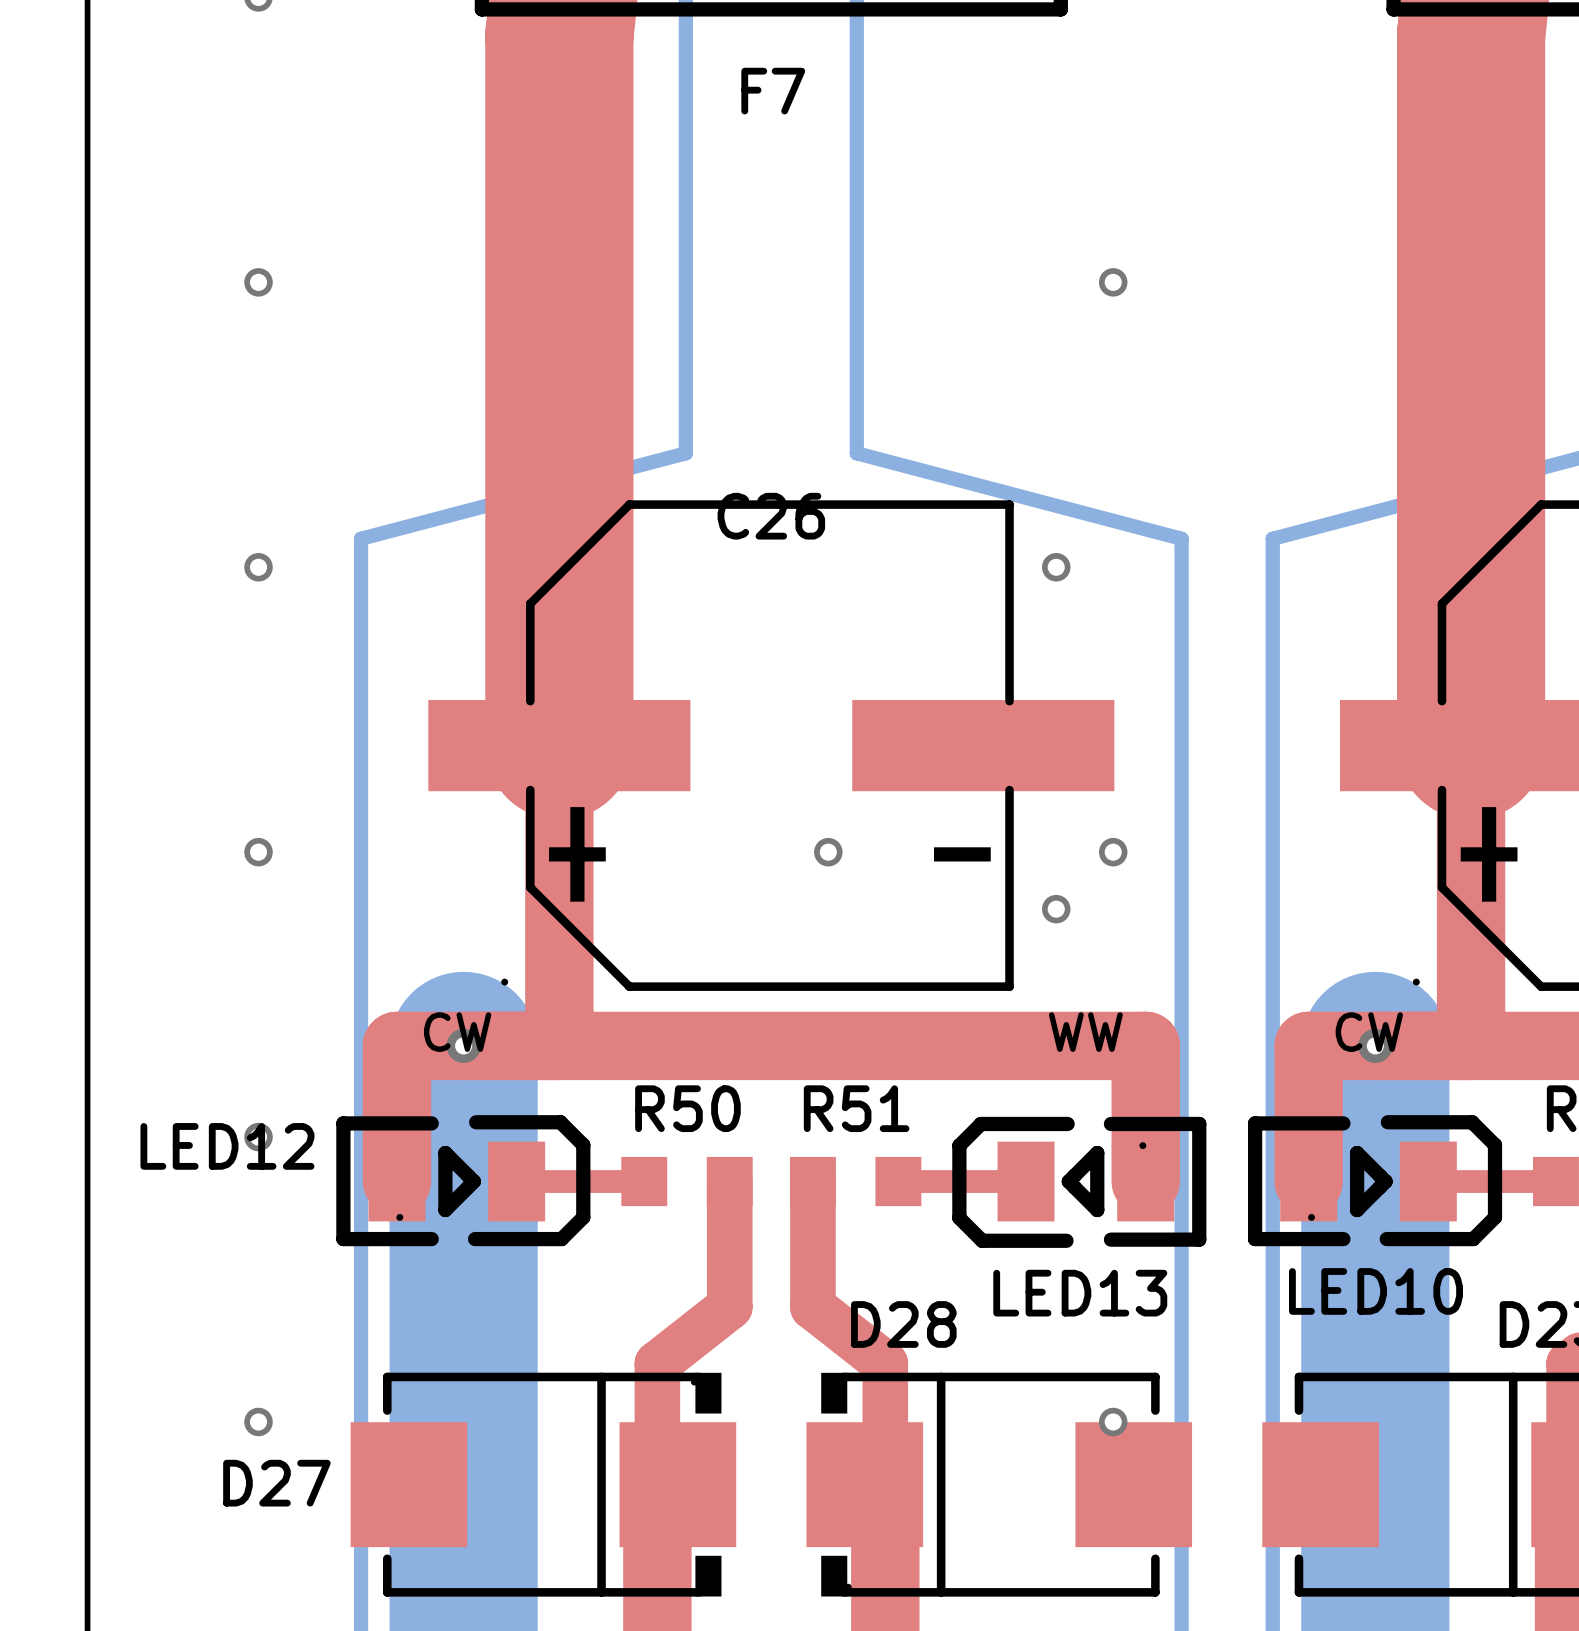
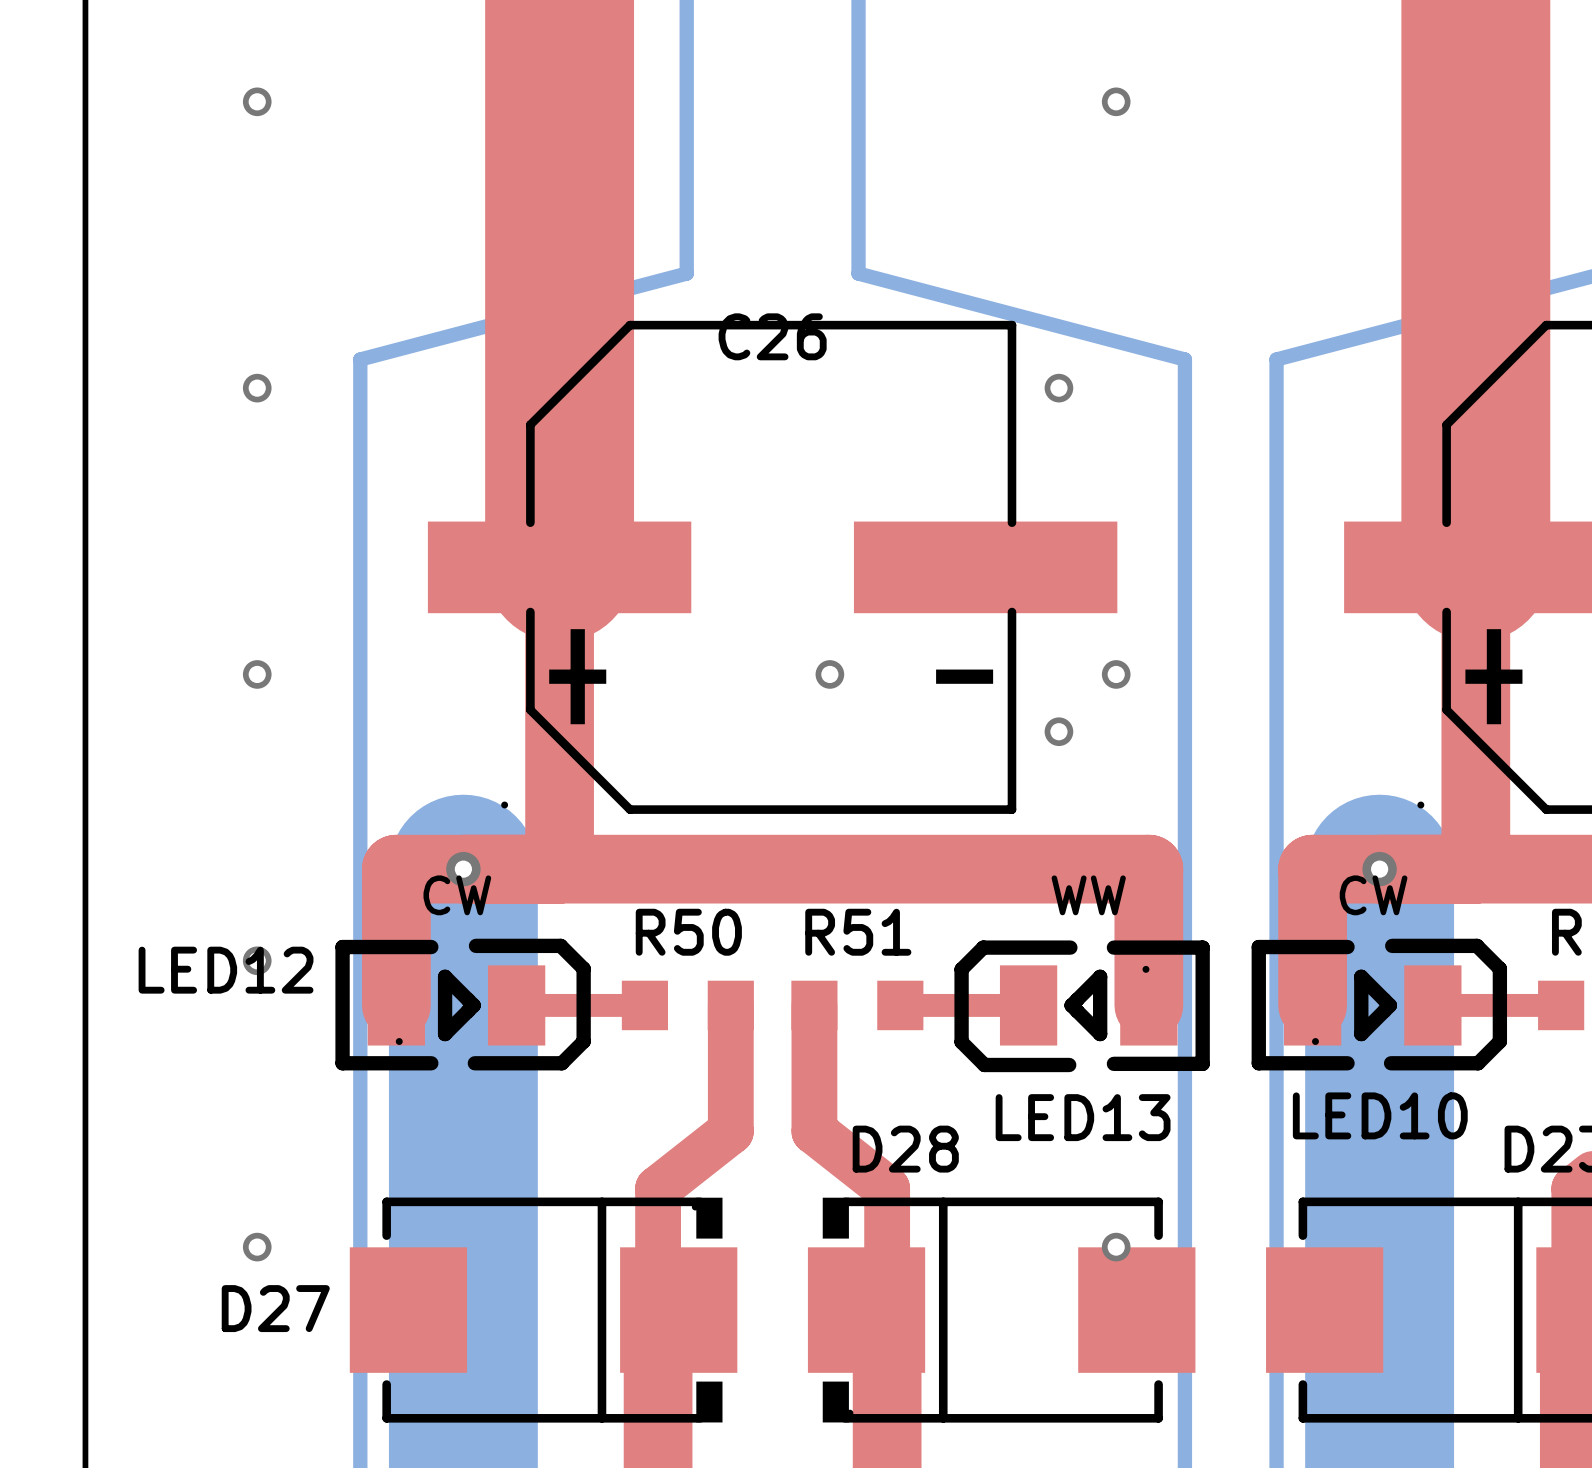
text position: CW (457, 1032) -> CW (457, 895)
text position: WW (1085, 1032) -> WW (1088, 895)
text position: CW (1369, 1032) -> CW (1373, 895)

